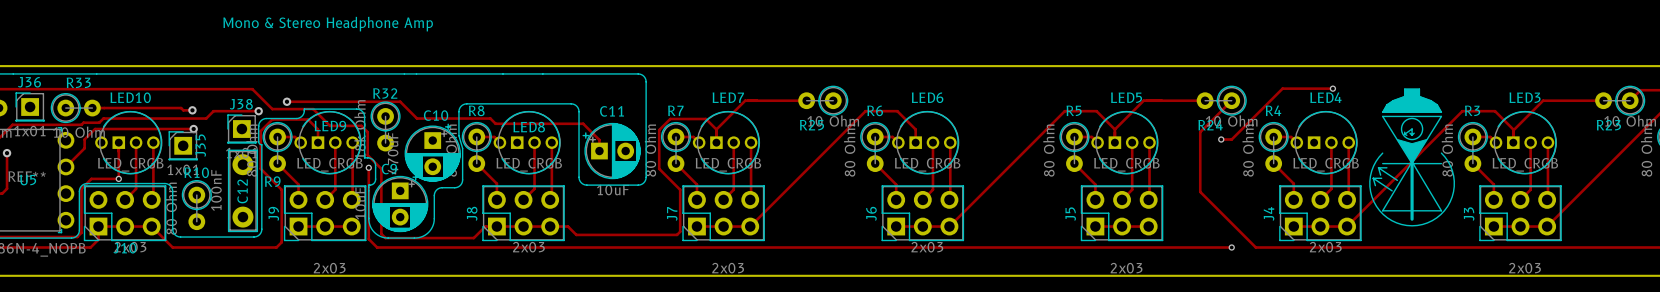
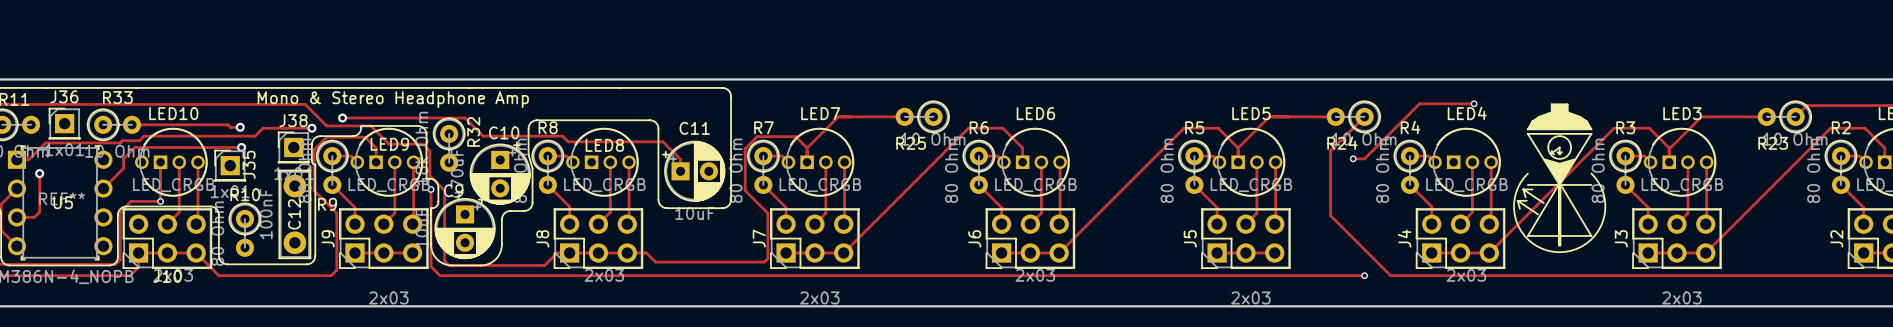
text position: Mono & Stereo Headphone Amp (328, 24) -> Mono & Stereo Headphone Amp (393, 99)
R32 name rotation: 0° (385, 93) -> 90° counterclockwise (473, 131)

